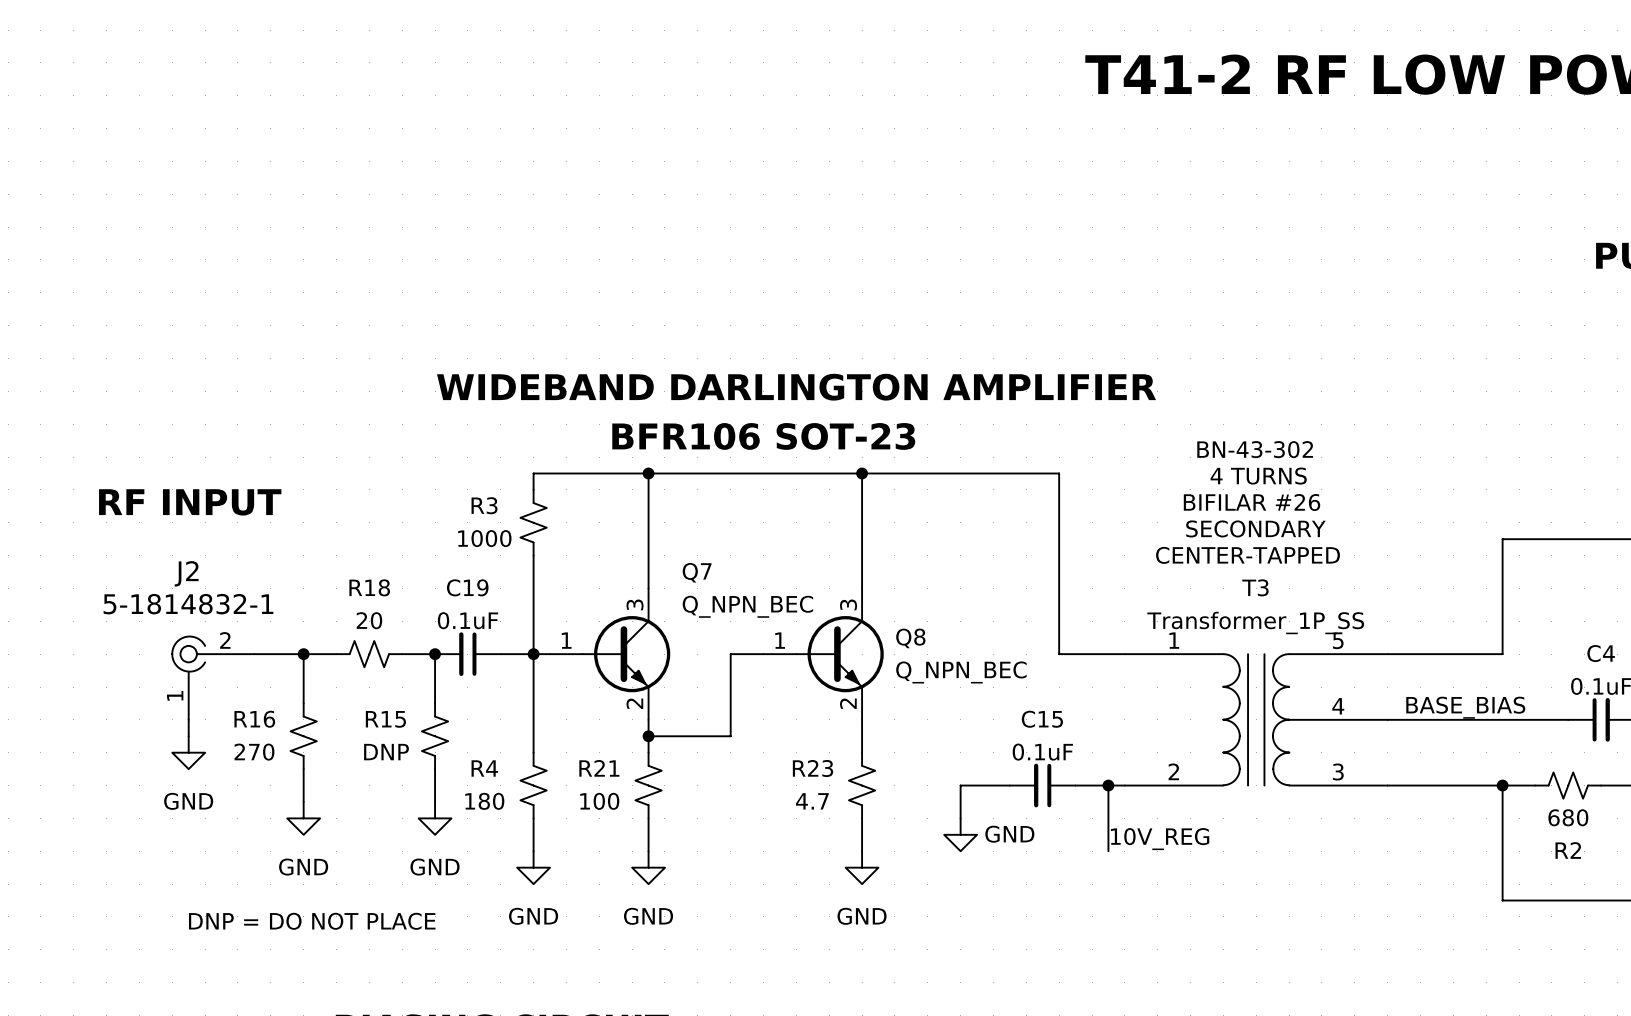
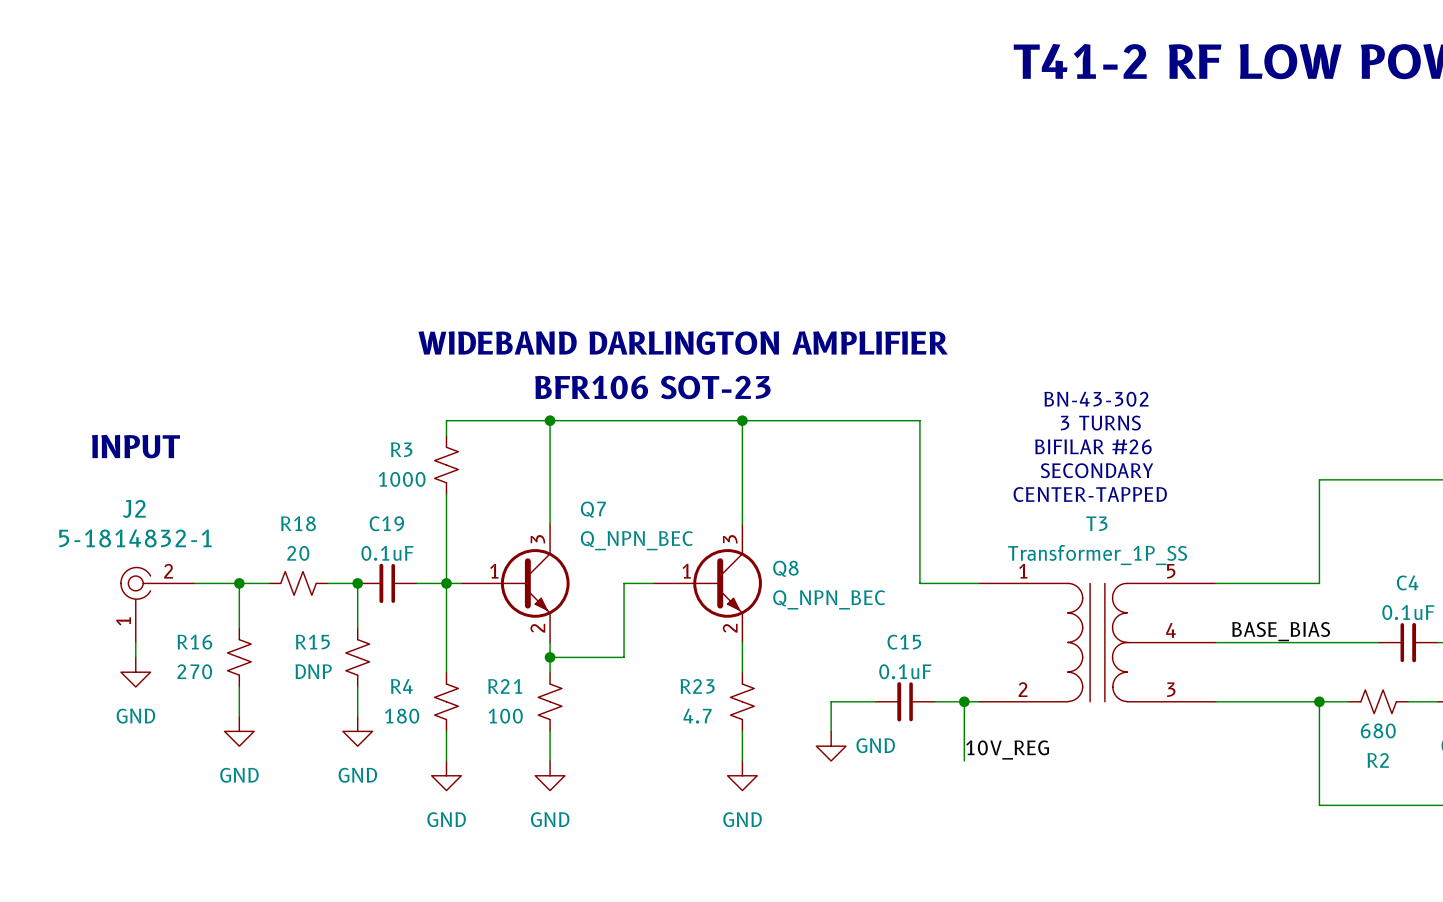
text: 4 TURNS (1258, 476) -> 3 TURNS (1100, 423)
text: RF INPUT (190, 502) -> INPUT (135, 446)
Q7 symbol: [550, 588, 671, 720] -> [461, 524, 570, 643]
Q8 symbol: [763, 588, 884, 720] -> [653, 524, 762, 643]
text: DNP = DO NOT PLACE (312, 921) -> none

